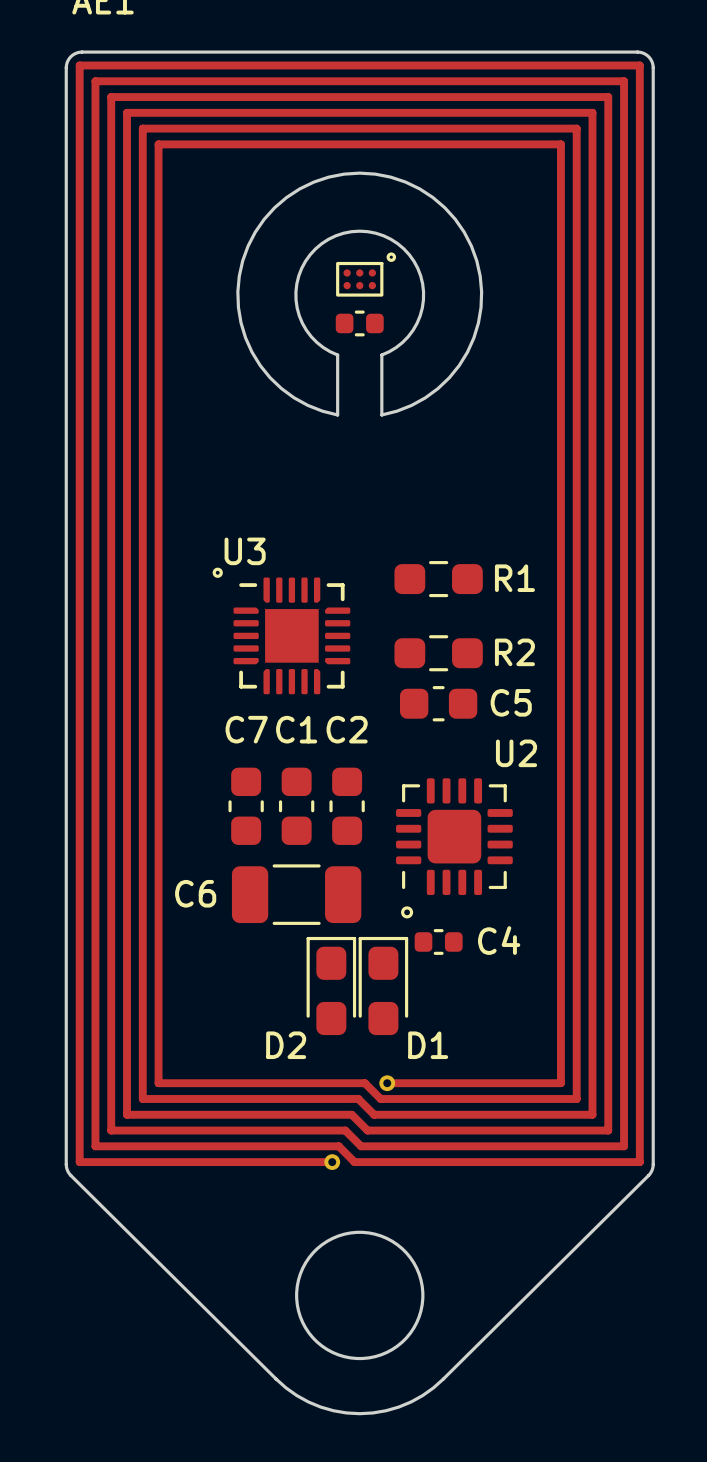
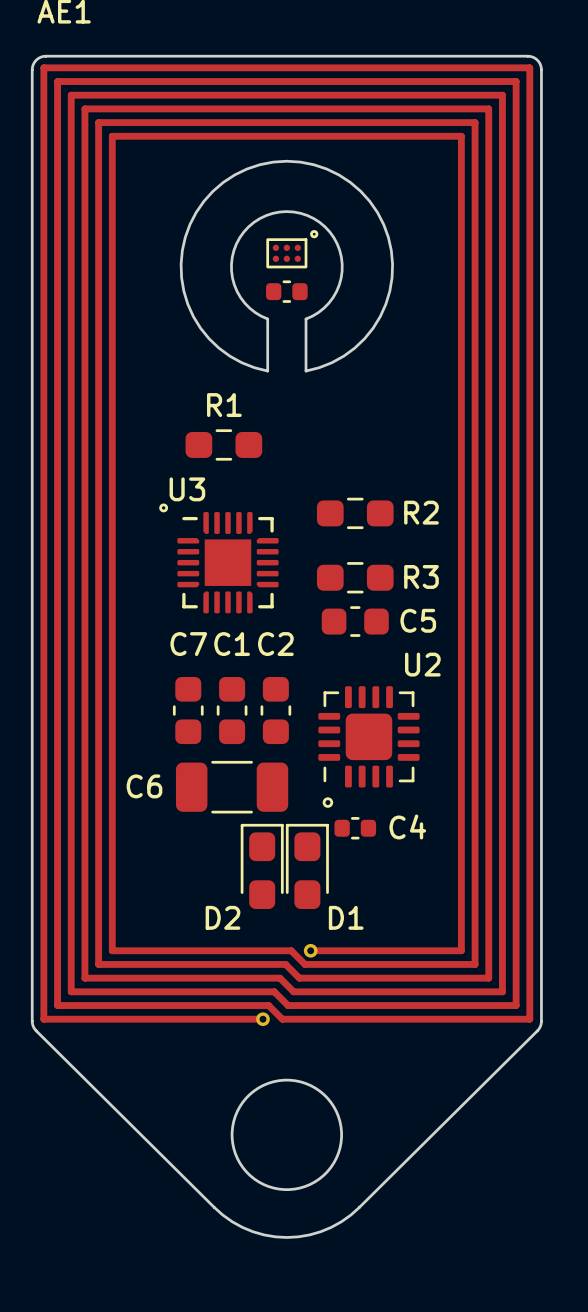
R1: none -> (223, 444)
R1 name: R1 (514, 578) -> R2 (421, 512)
R2 name: R2 (514, 652) -> R3 (421, 576)

